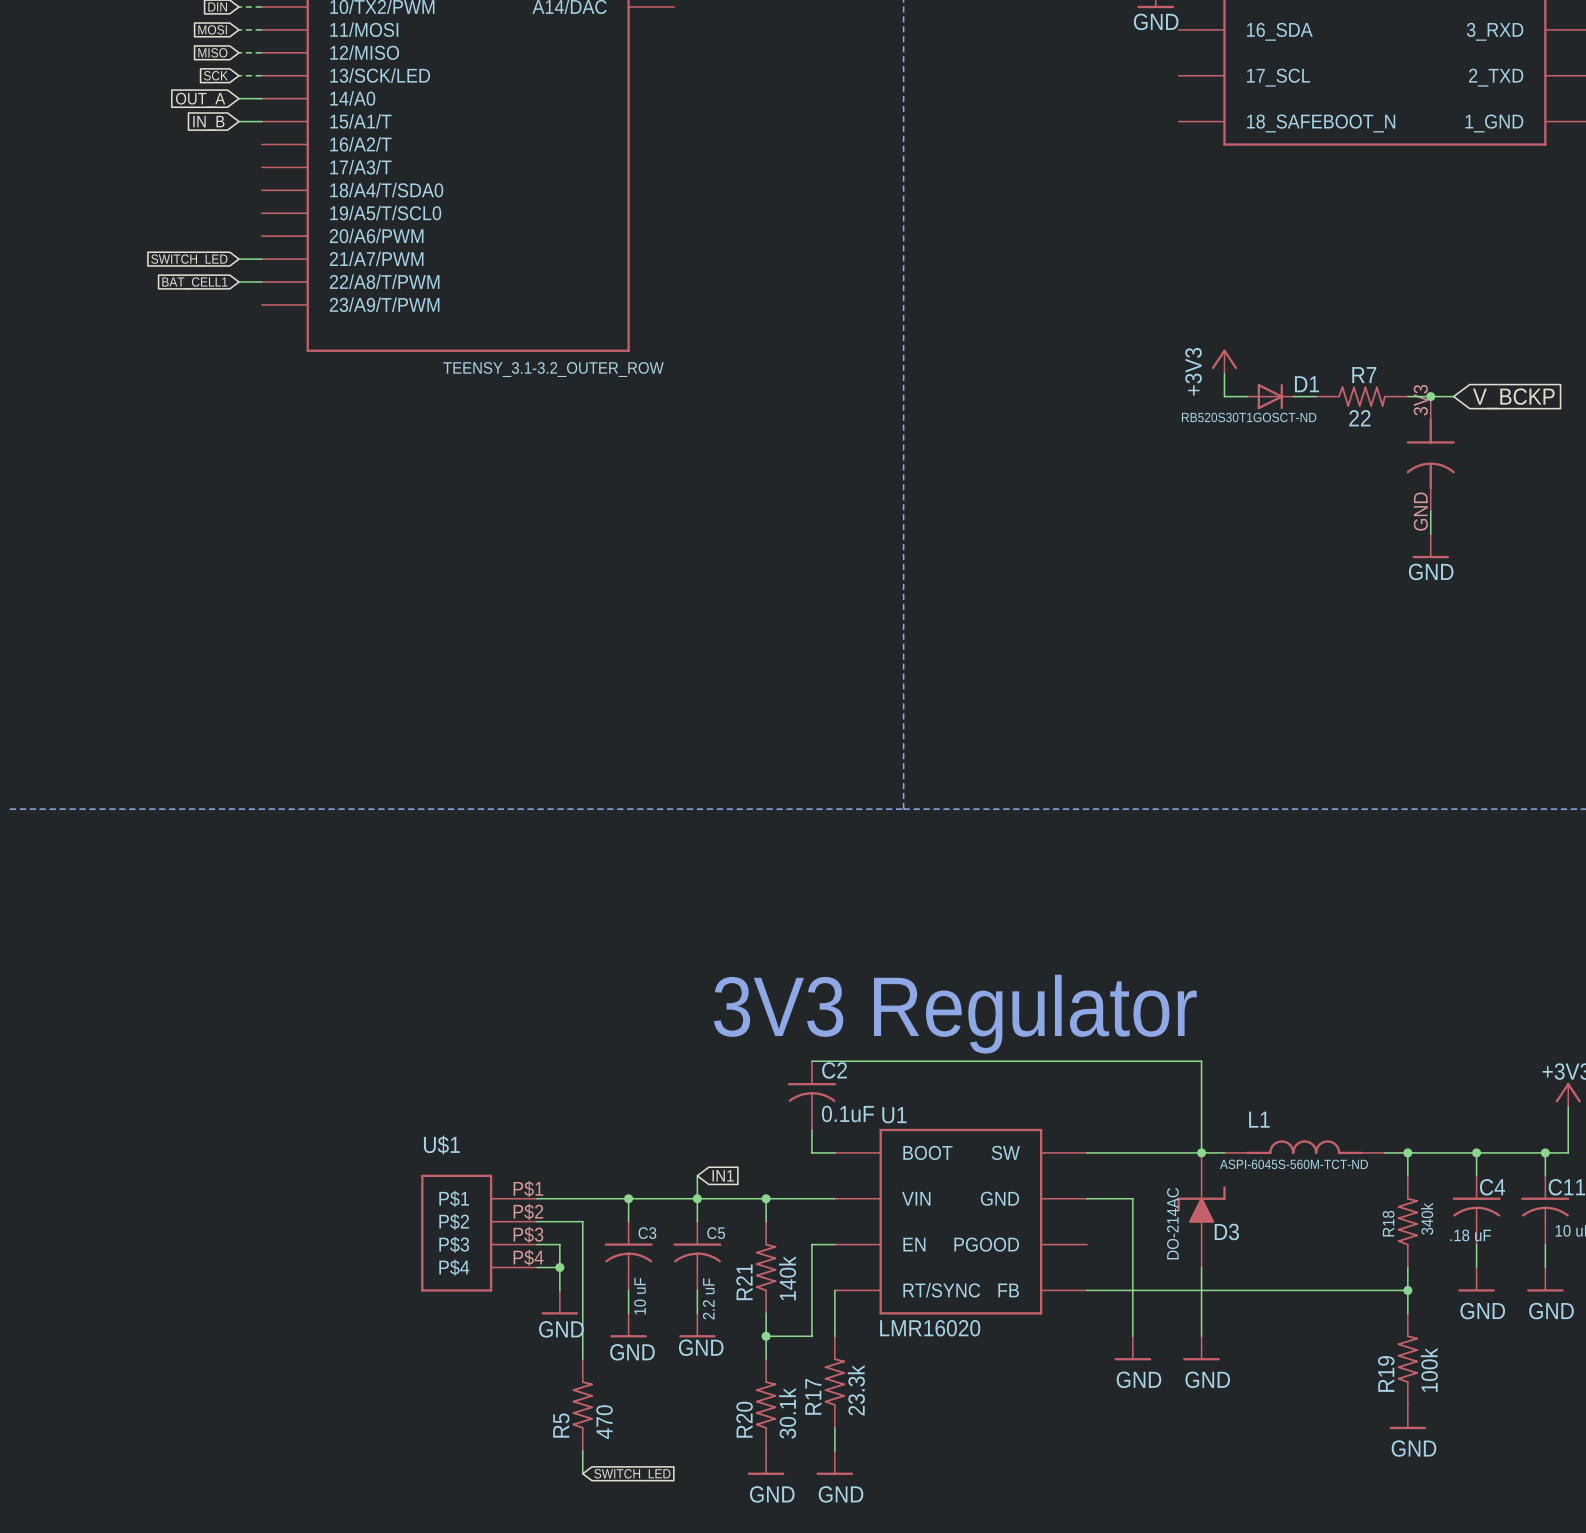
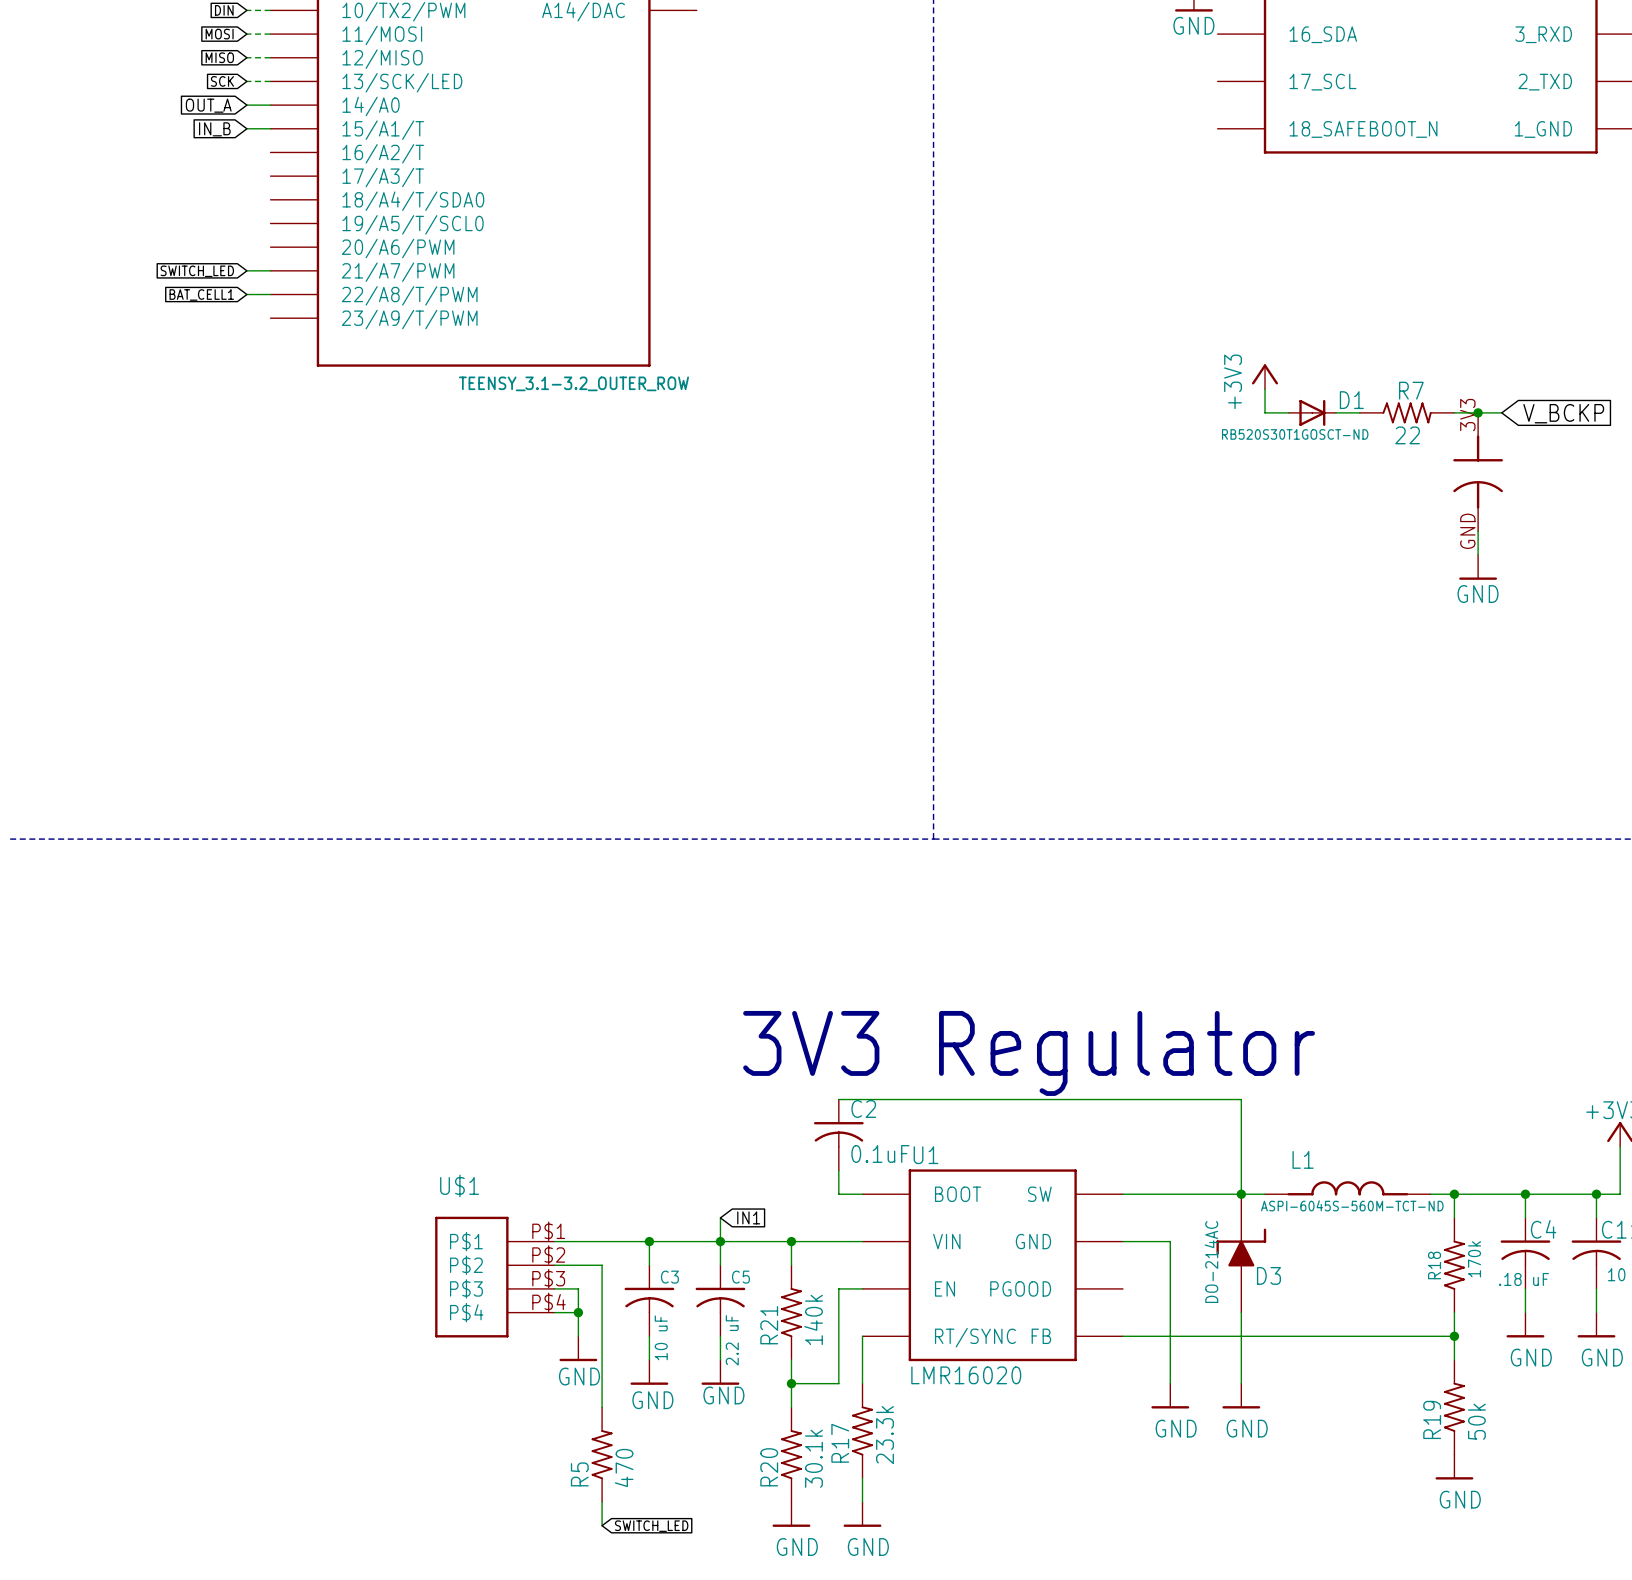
R18 value: 340k (1427, 1218) -> 170k (1474, 1259)
R19 value: 100k (1429, 1369) -> 50k (1476, 1421)

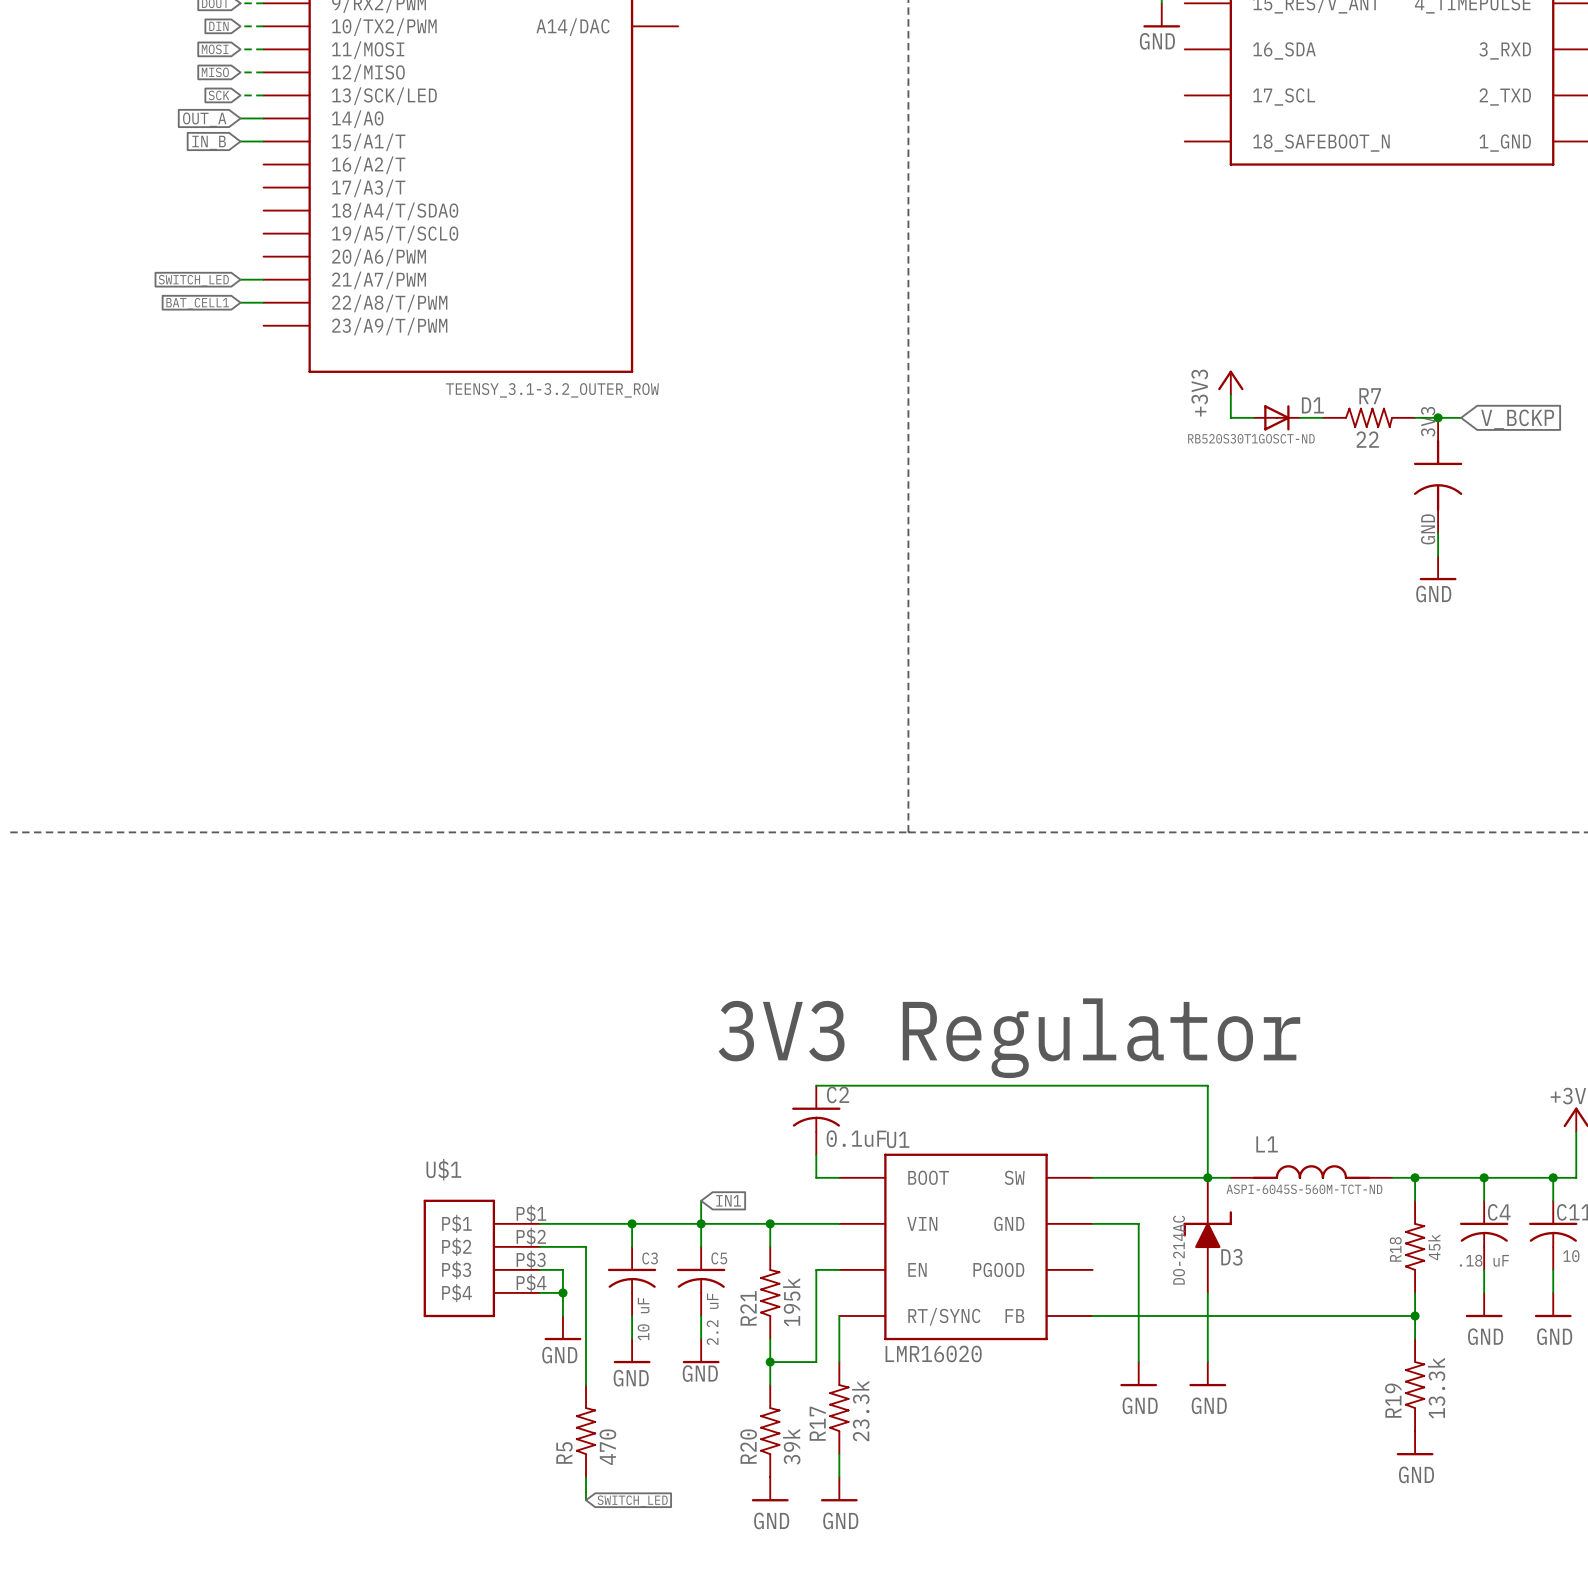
R18 value: 170k (1474, 1259) -> 45k (1434, 1247)
R21 value: 140k (813, 1319) -> 195k (791, 1302)
R19 value: 50k (1476, 1421) -> 13.3k (1436, 1388)
R20 value: 30.1k (813, 1458) -> 39k (791, 1446)

